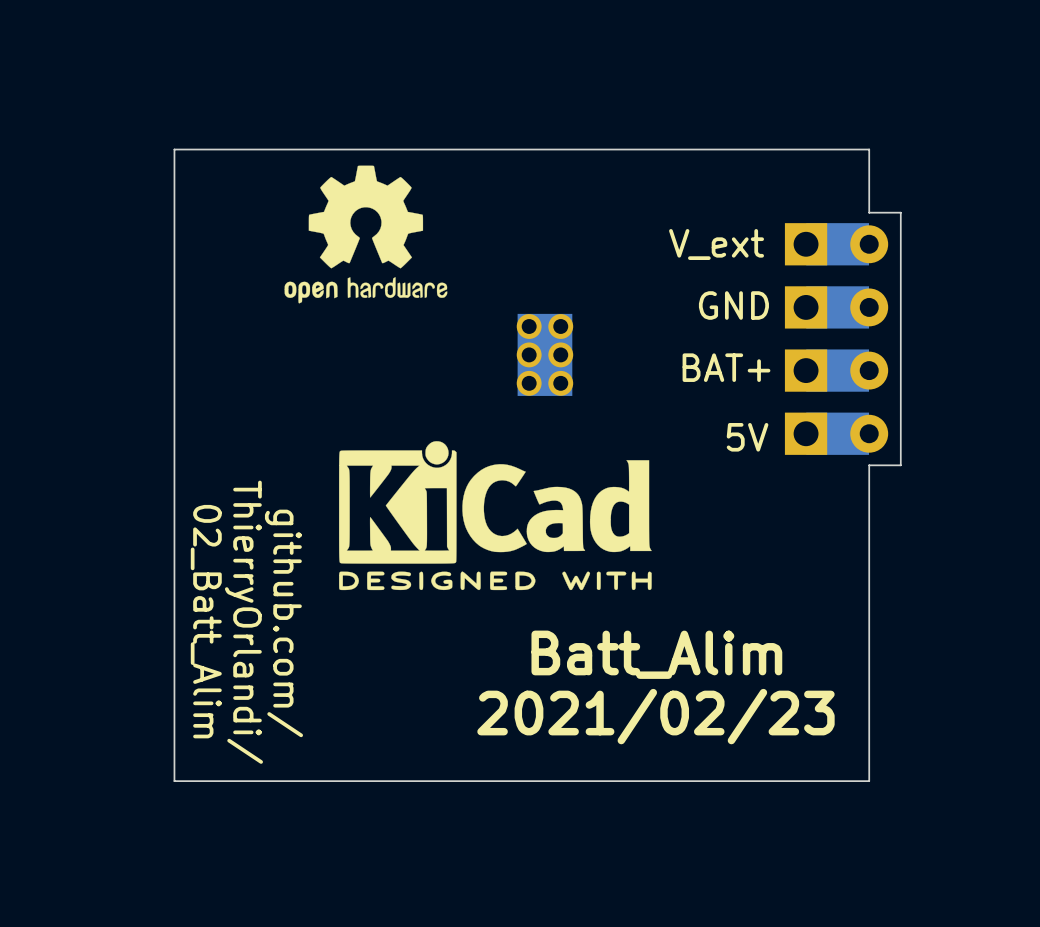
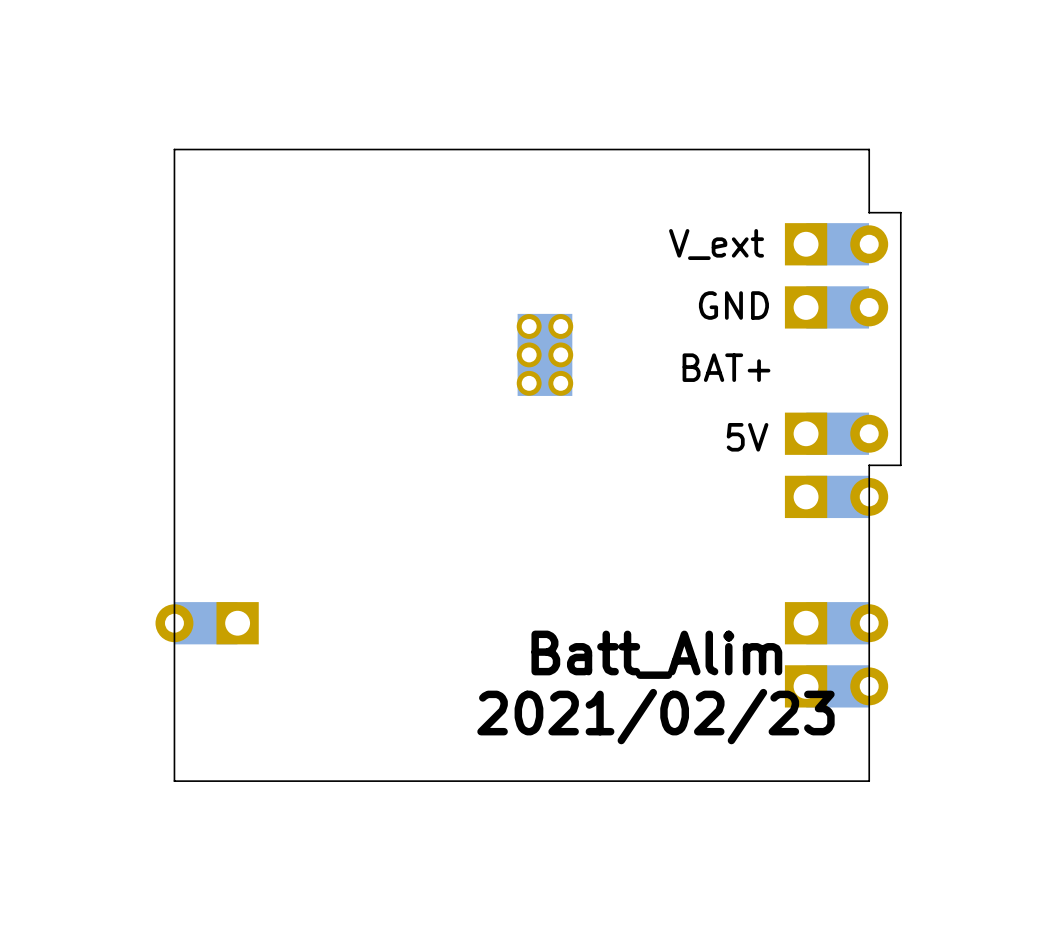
drawing: [284, 165, 448, 304] -> none
part: (836, 370) -> none
drawing: [339, 441, 652, 591] -> none
part: none -> (836, 496)
text: 02_Batt_Alim (206, 621) -> none
text: ThierryOrlandi/ (243, 622) -> none
part: none -> (207, 623)
text: github.com/ (283, 623) -> none
part: none -> (836, 623)
part: none -> (836, 686)

